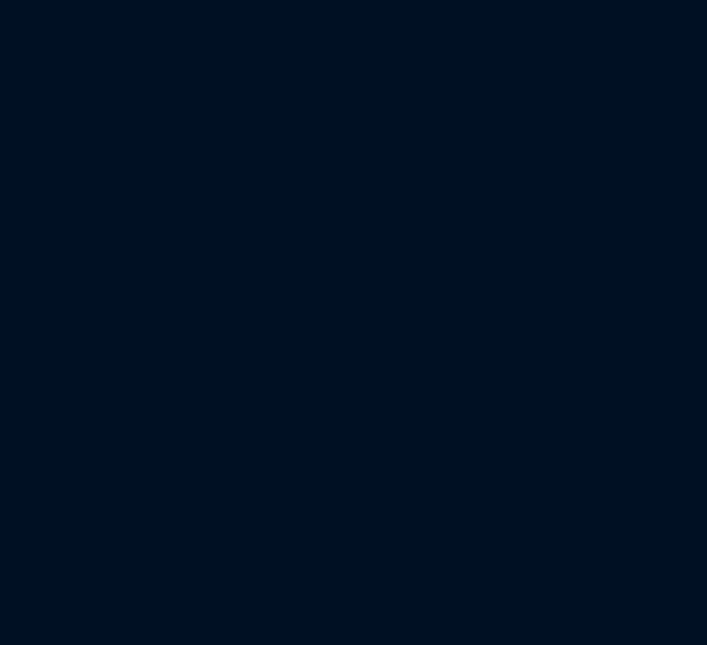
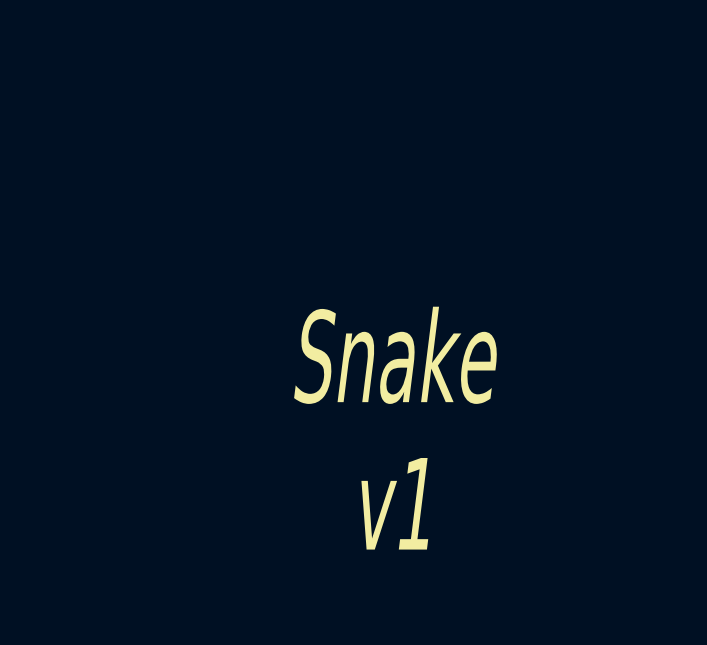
text: none -> Snake (396, 355)
text: none -> v1 (394, 503)

